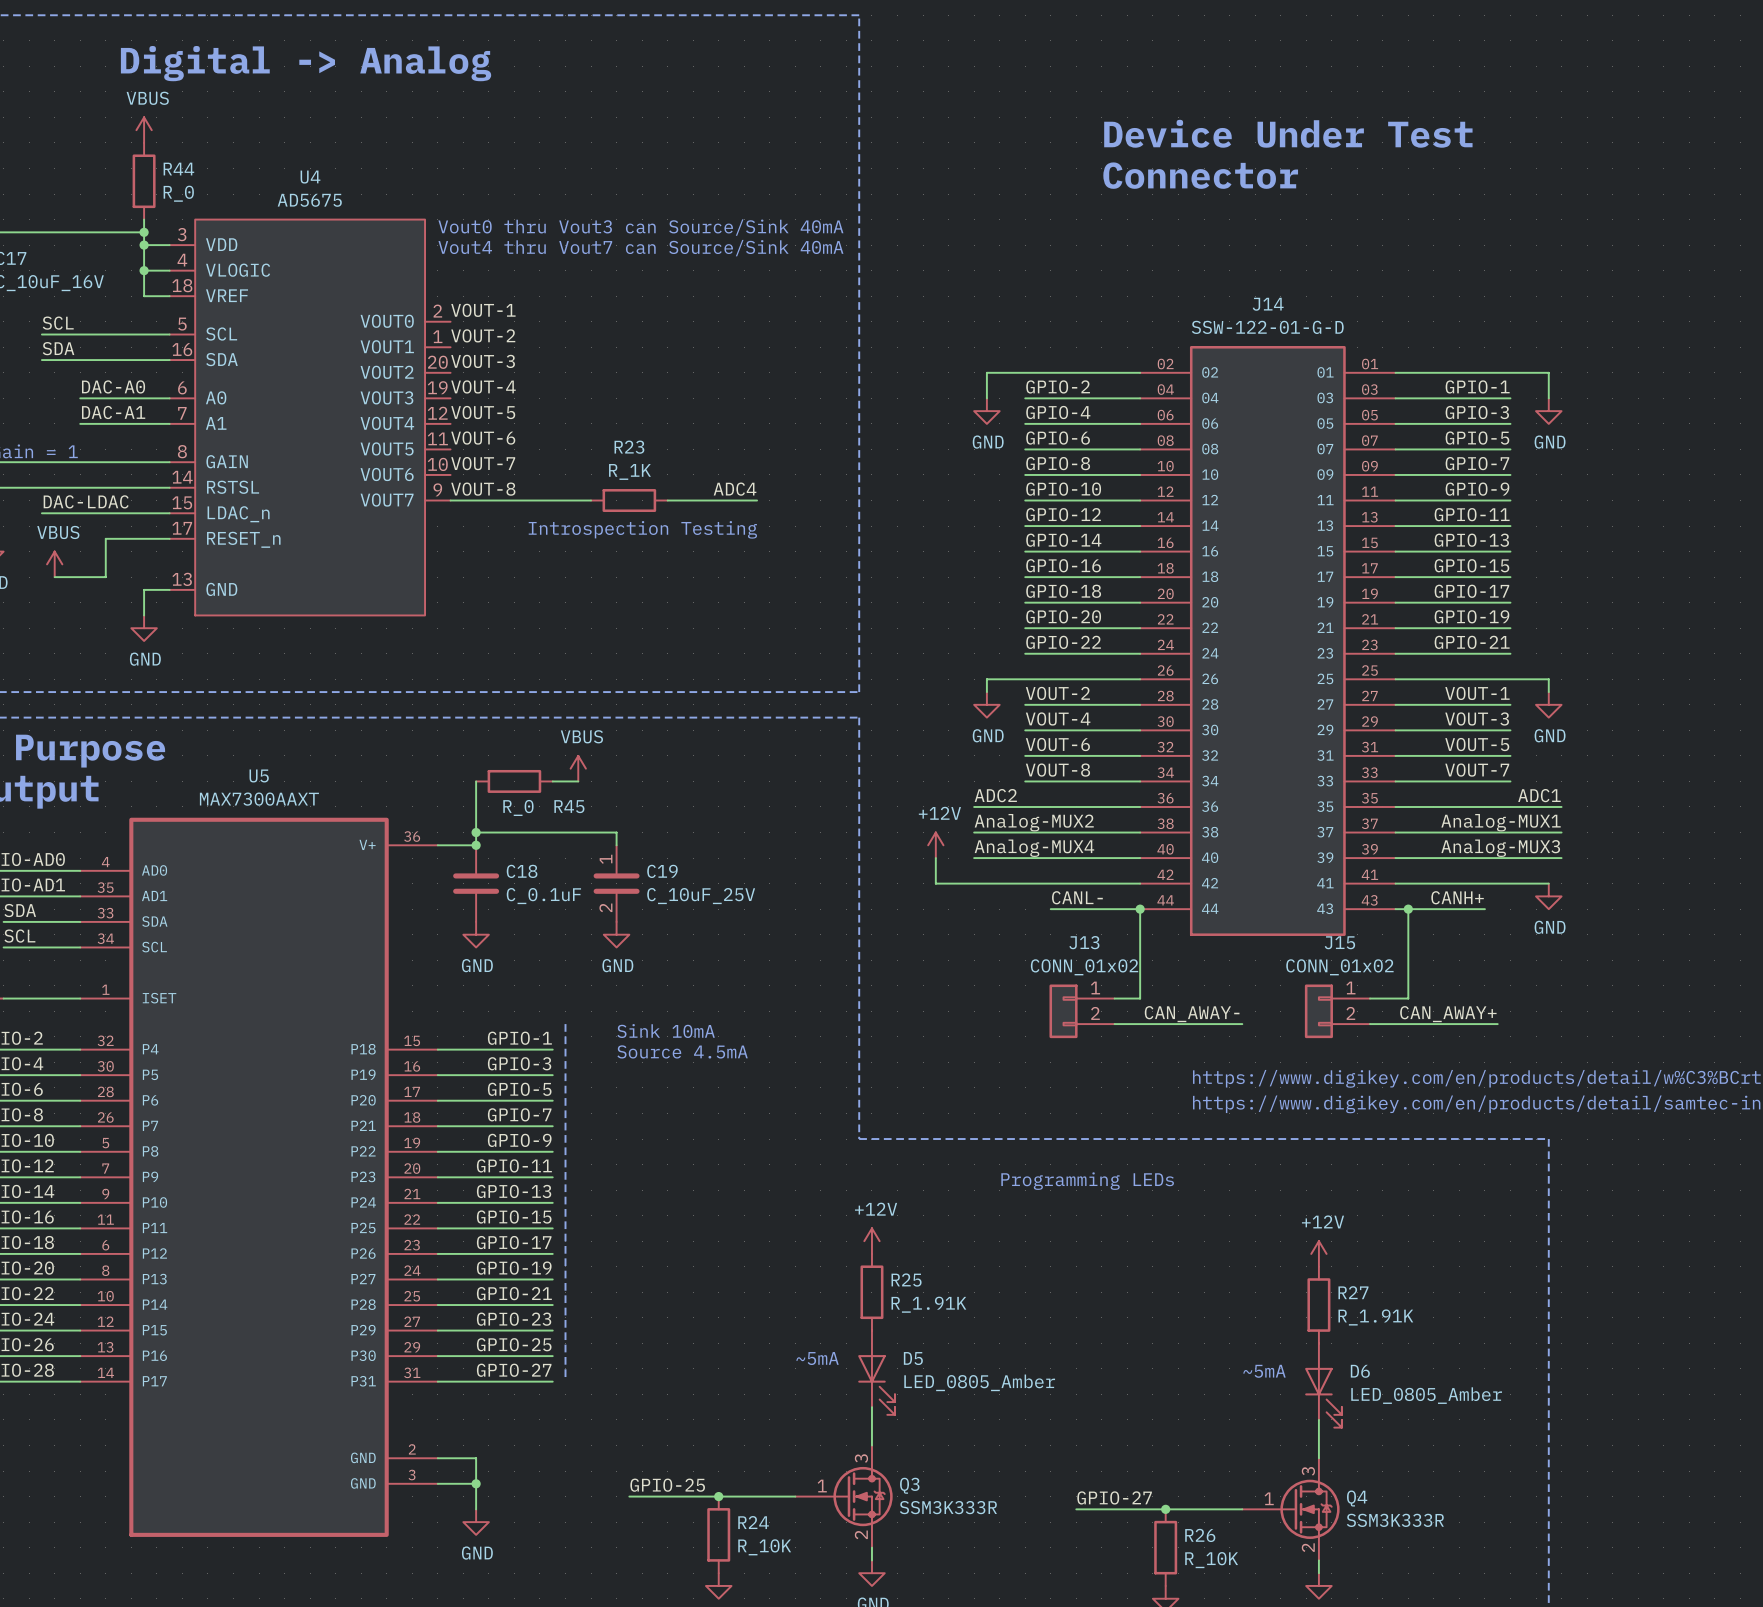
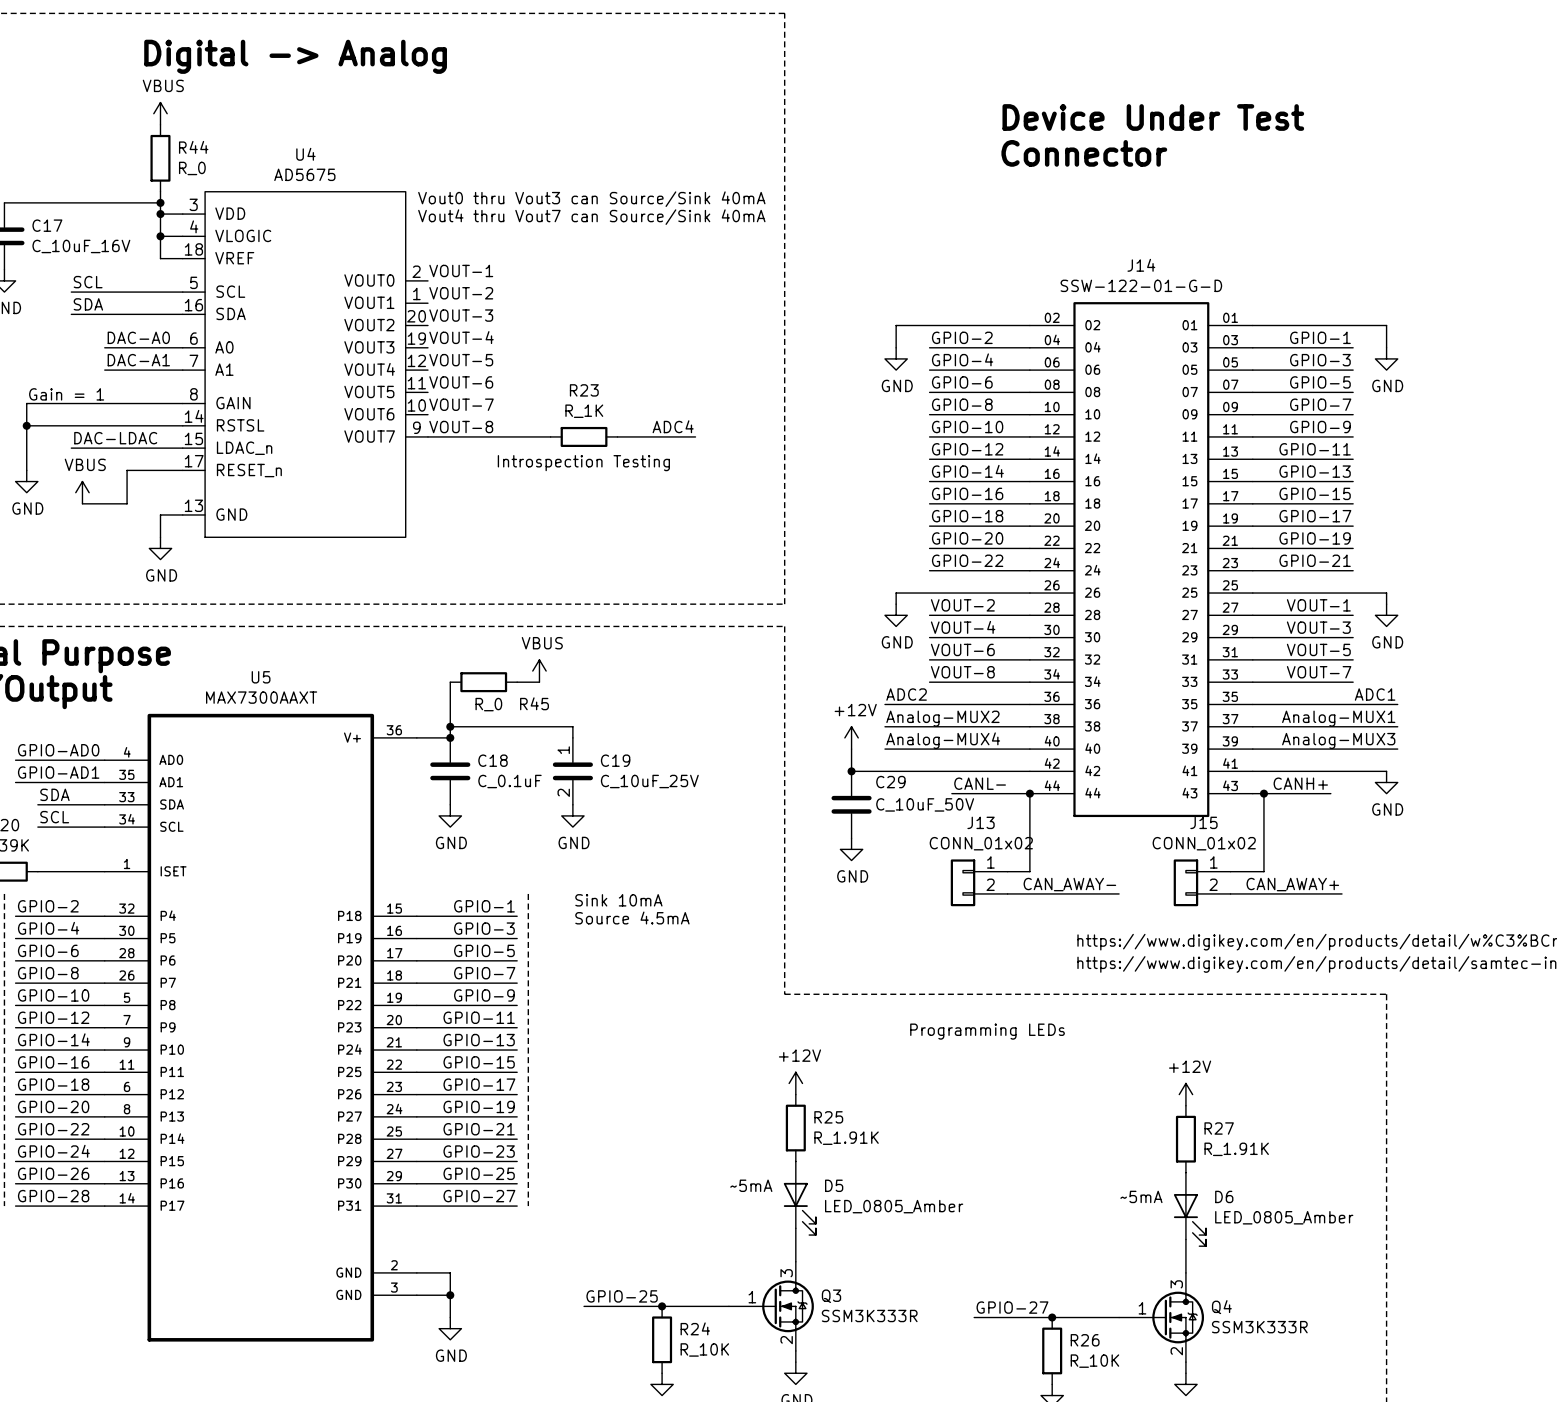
junction: none -> (851, 771)
C29: none -> C_10uF_50V (851, 804)
power symbol: none -> GND (851, 849)

